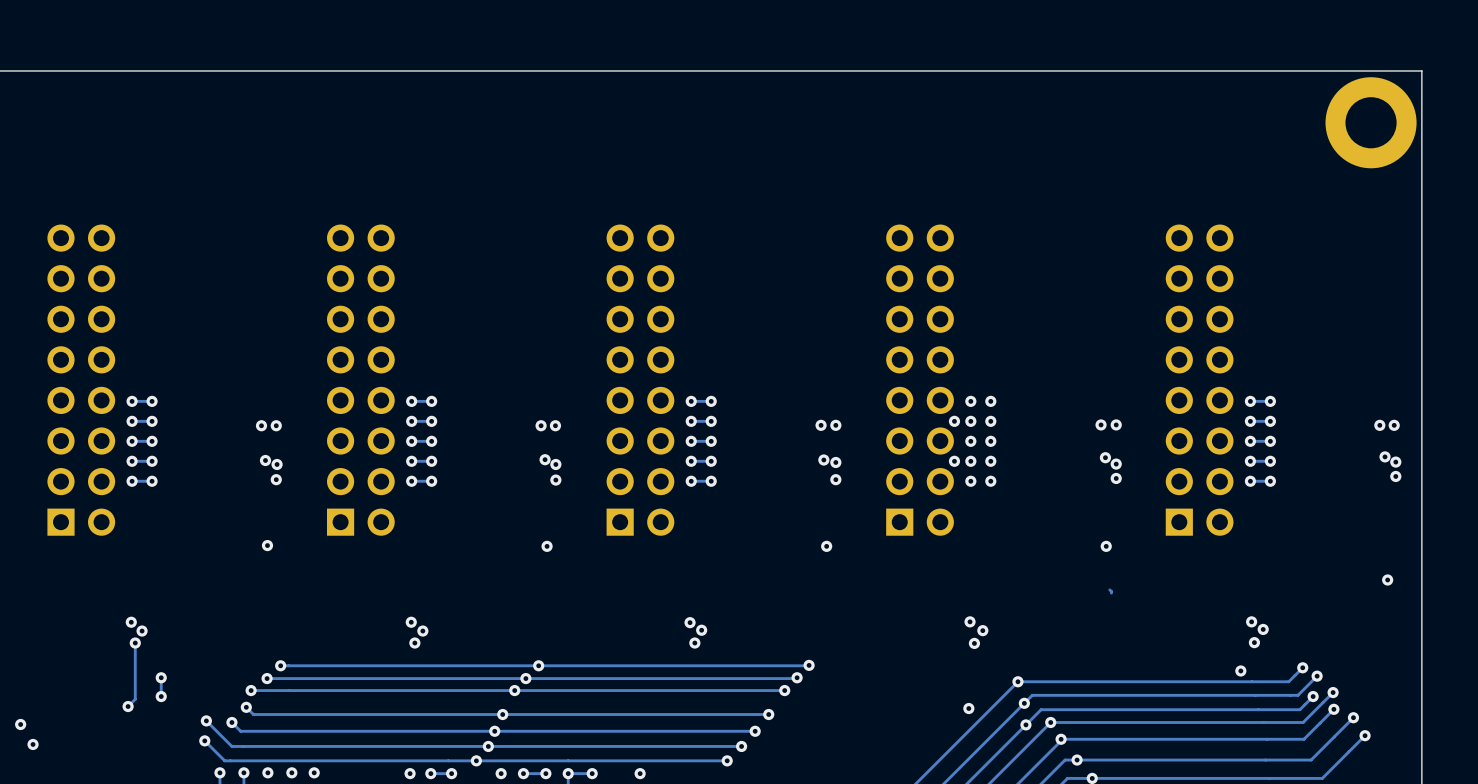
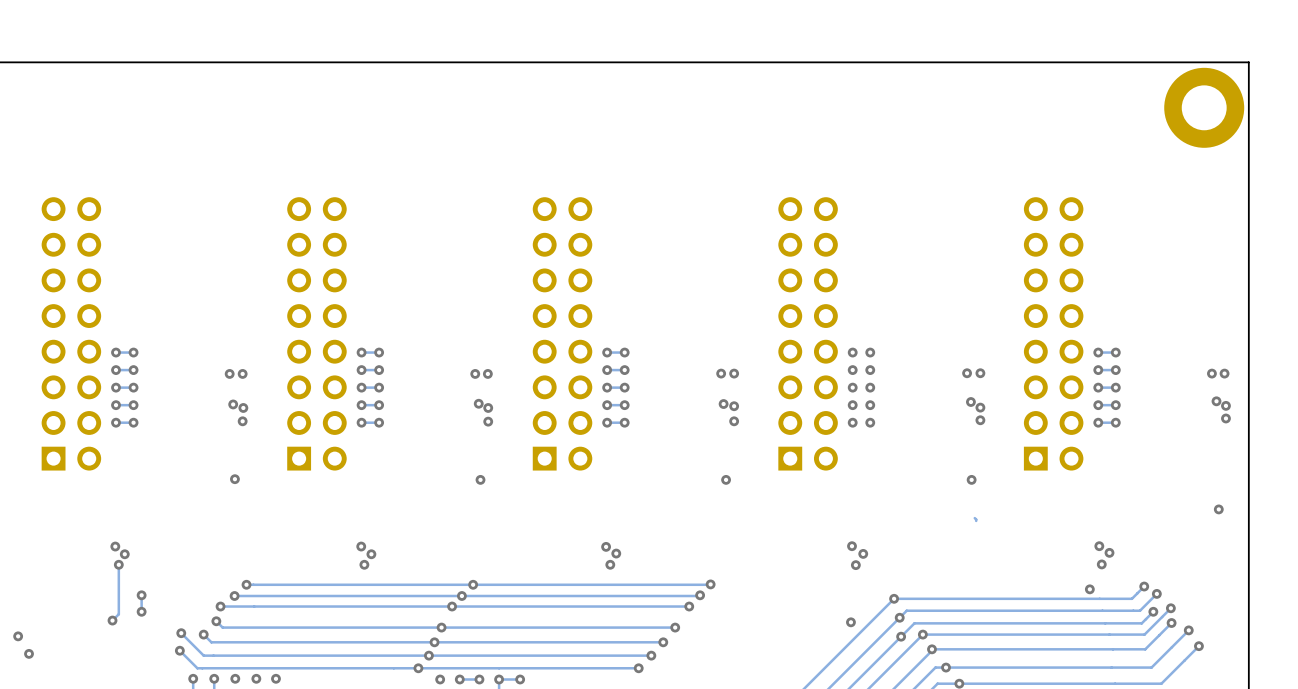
via: (954, 421) -> none
via: (954, 461) -> none
via: (410, 773) -> none
via: (430, 773) -> none
track: (451, 773) (430, 773) -> none
via: (451, 773) -> none
via: (640, 773) -> none

